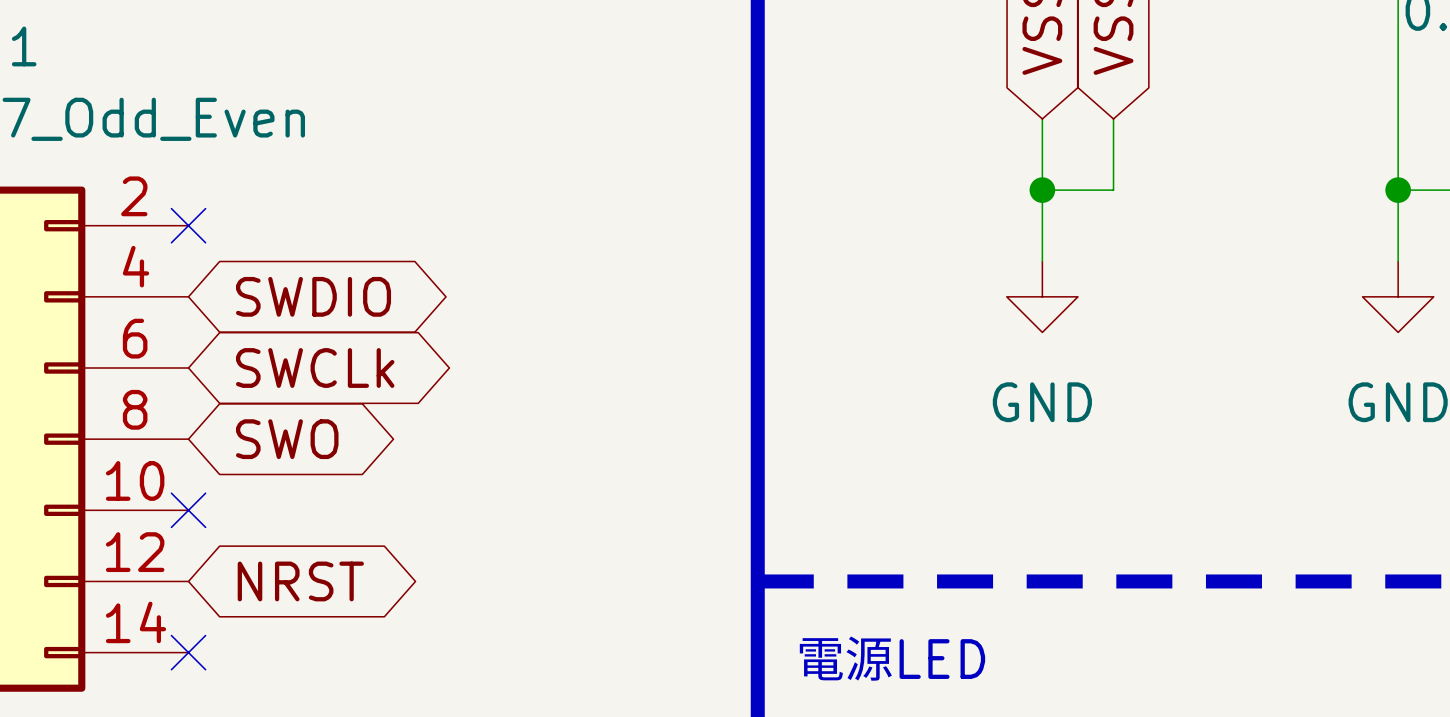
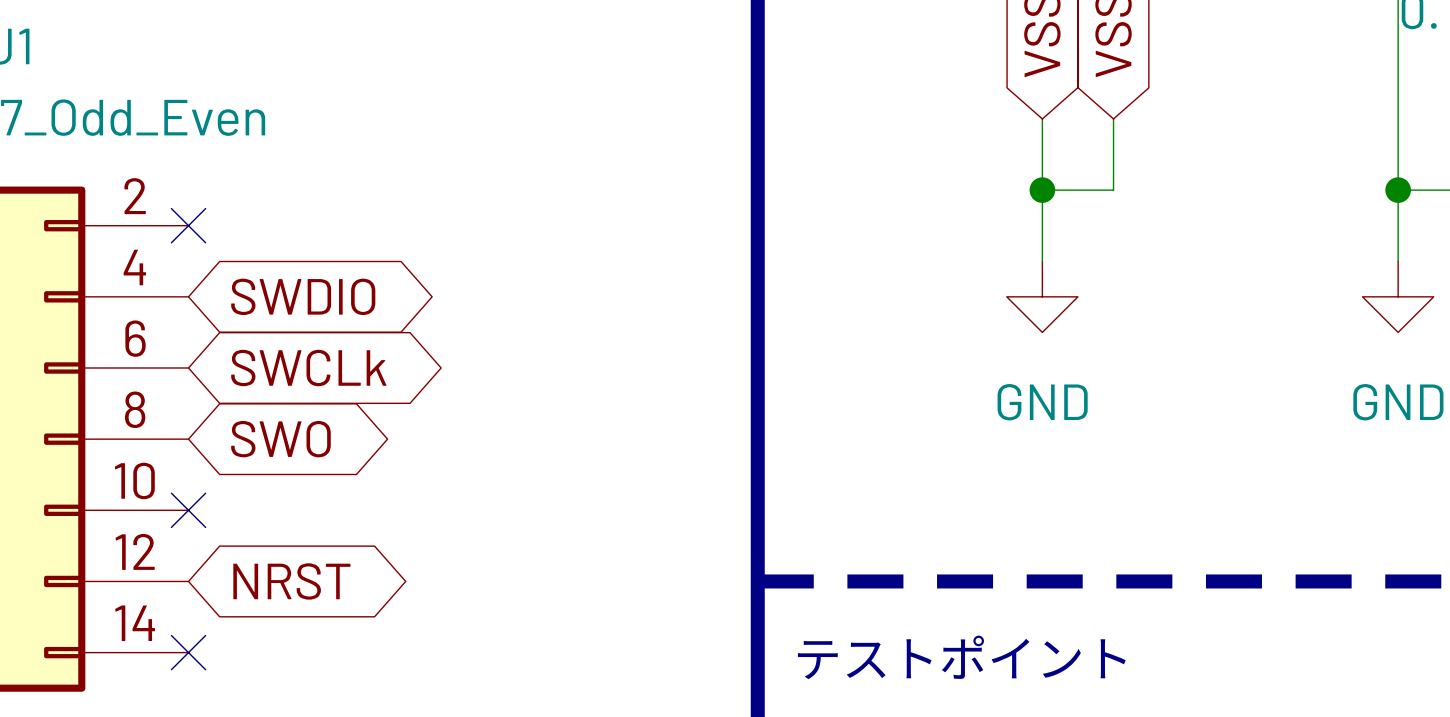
text: 電源LED (891, 658) -> テストポイント (961, 657)

